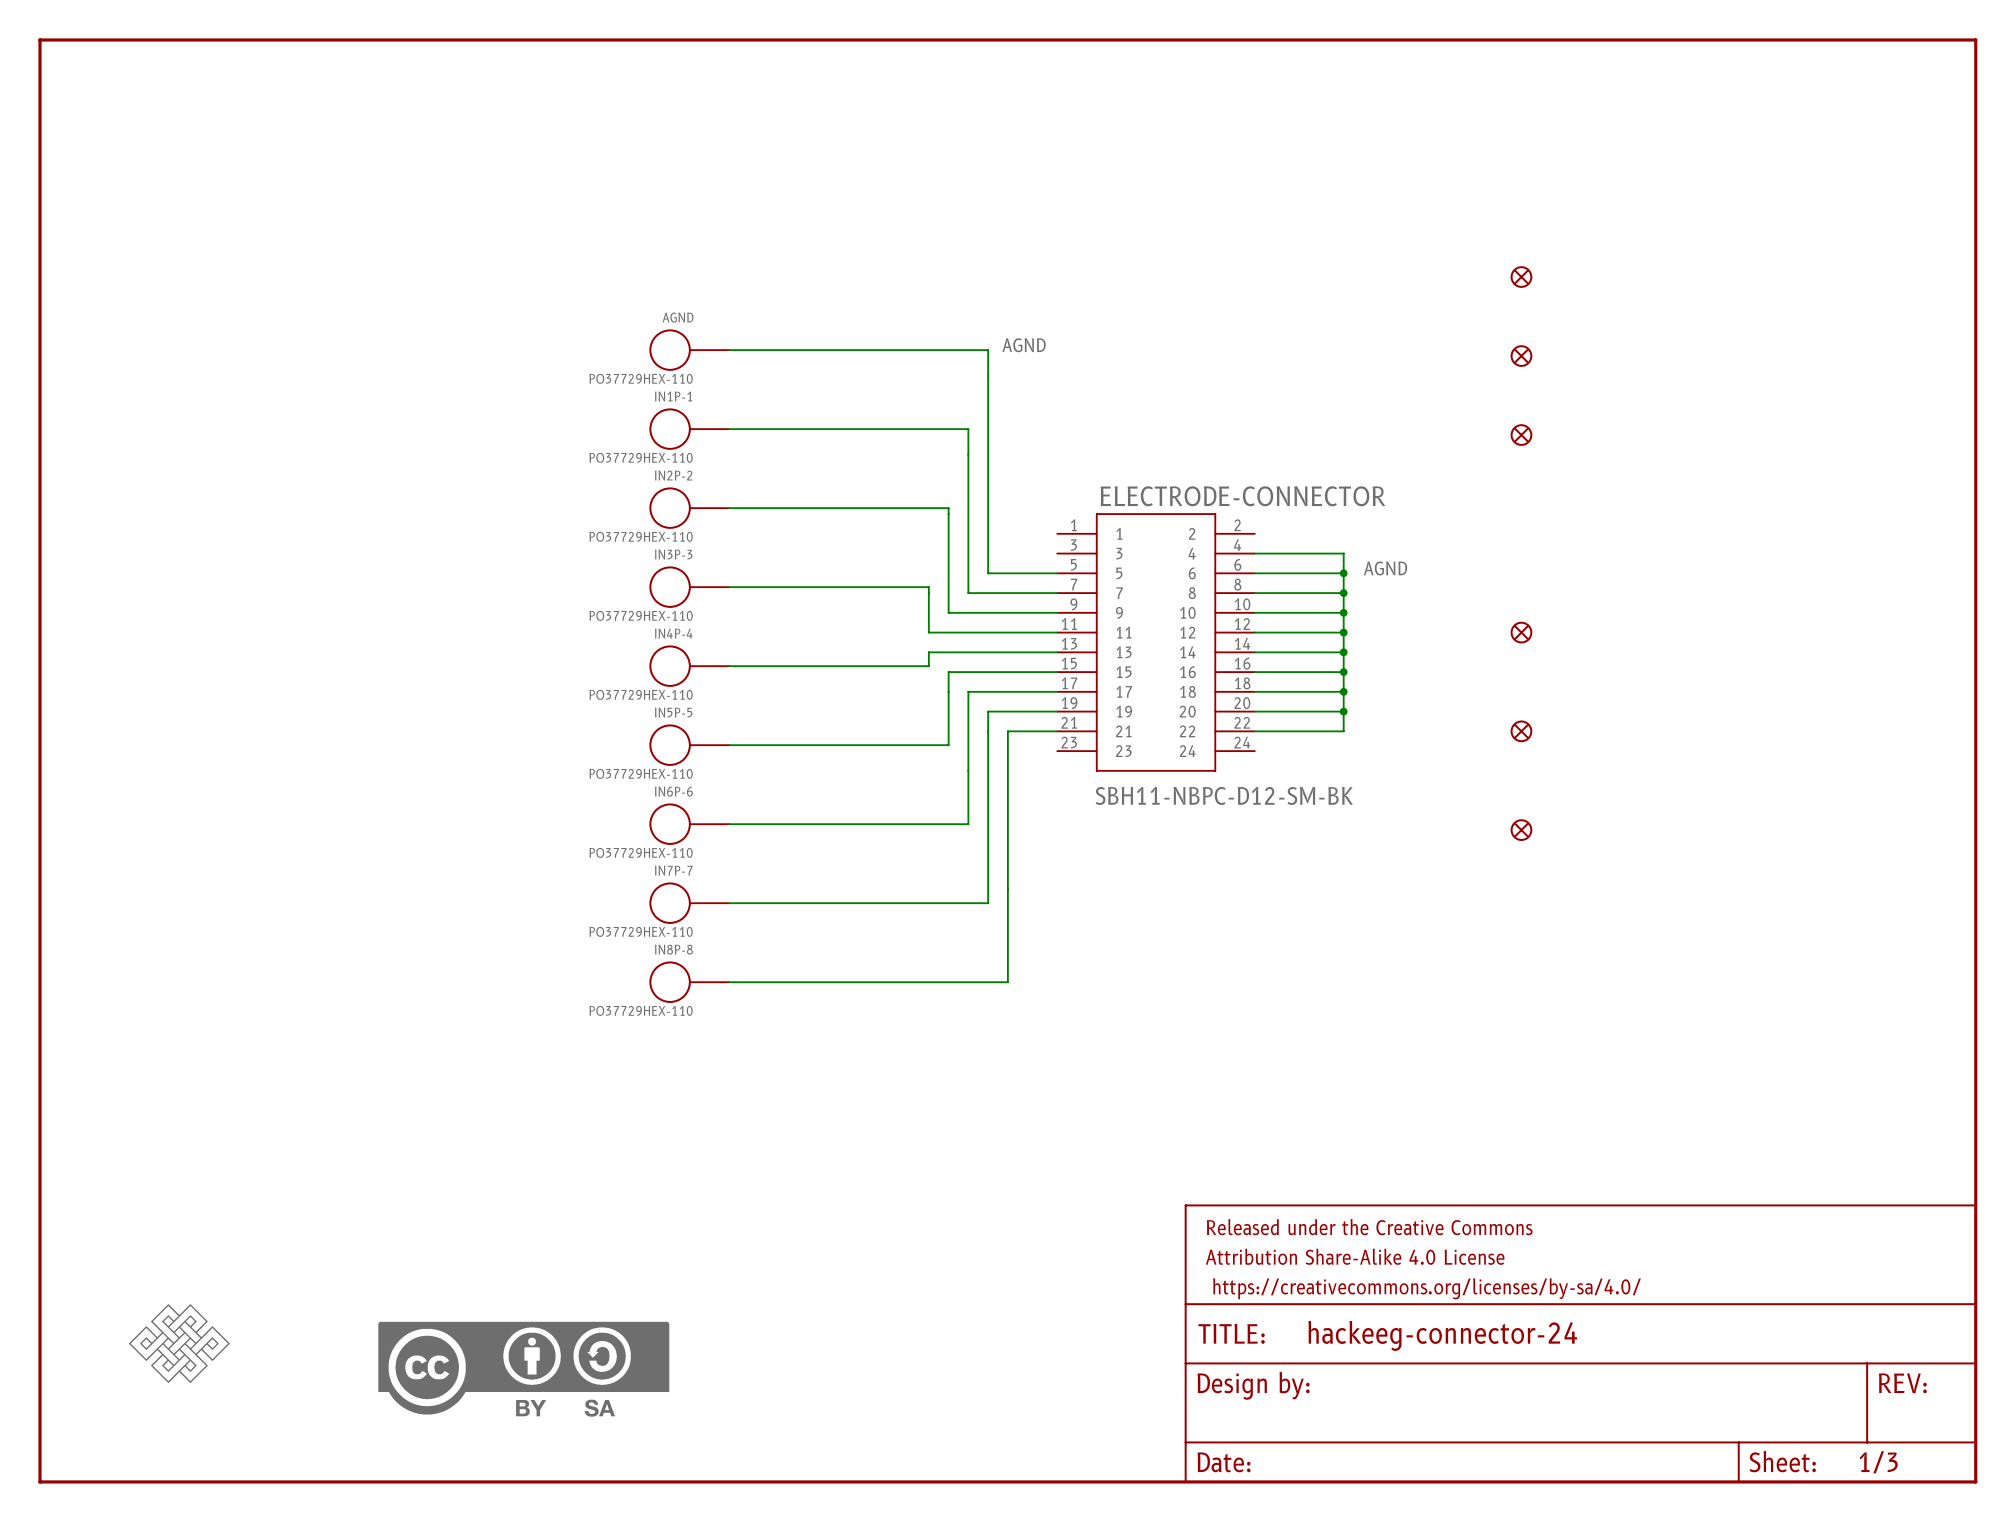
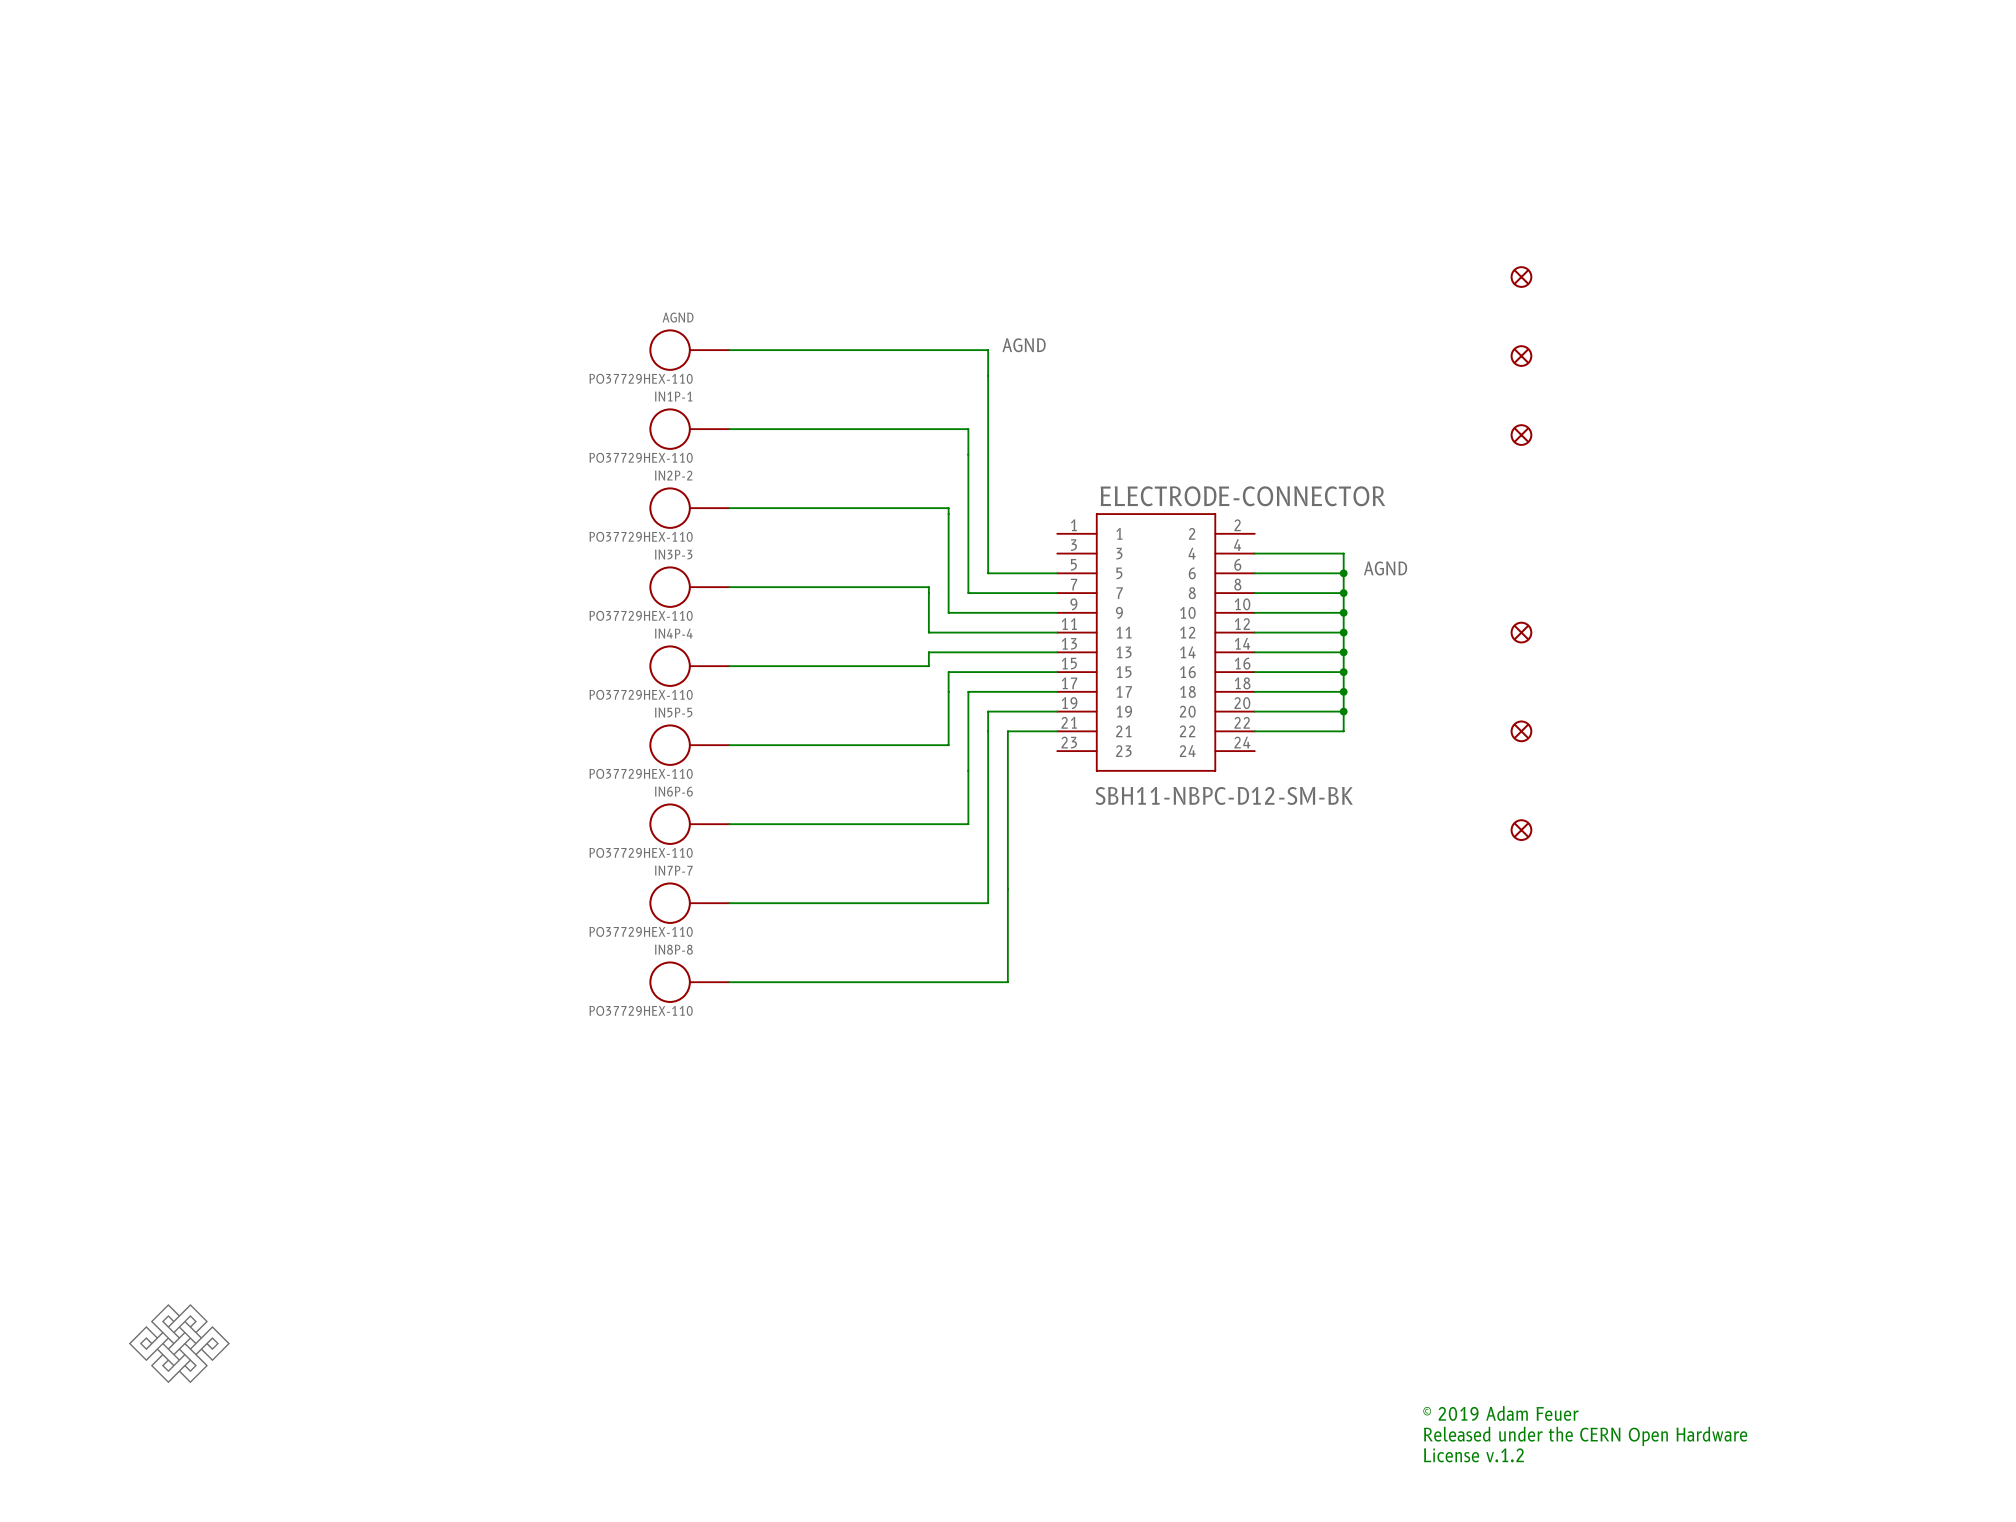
part: (1007, 760) -> none
part: (1580, 1343) -> none
part: (523, 1369) -> none
text: none -> © 2019 Adam Feuer (1501, 1413)
text: none -> Released under the CERN Open Hardware (1585, 1436)
text: none -> License v.1.2 (1473, 1455)

